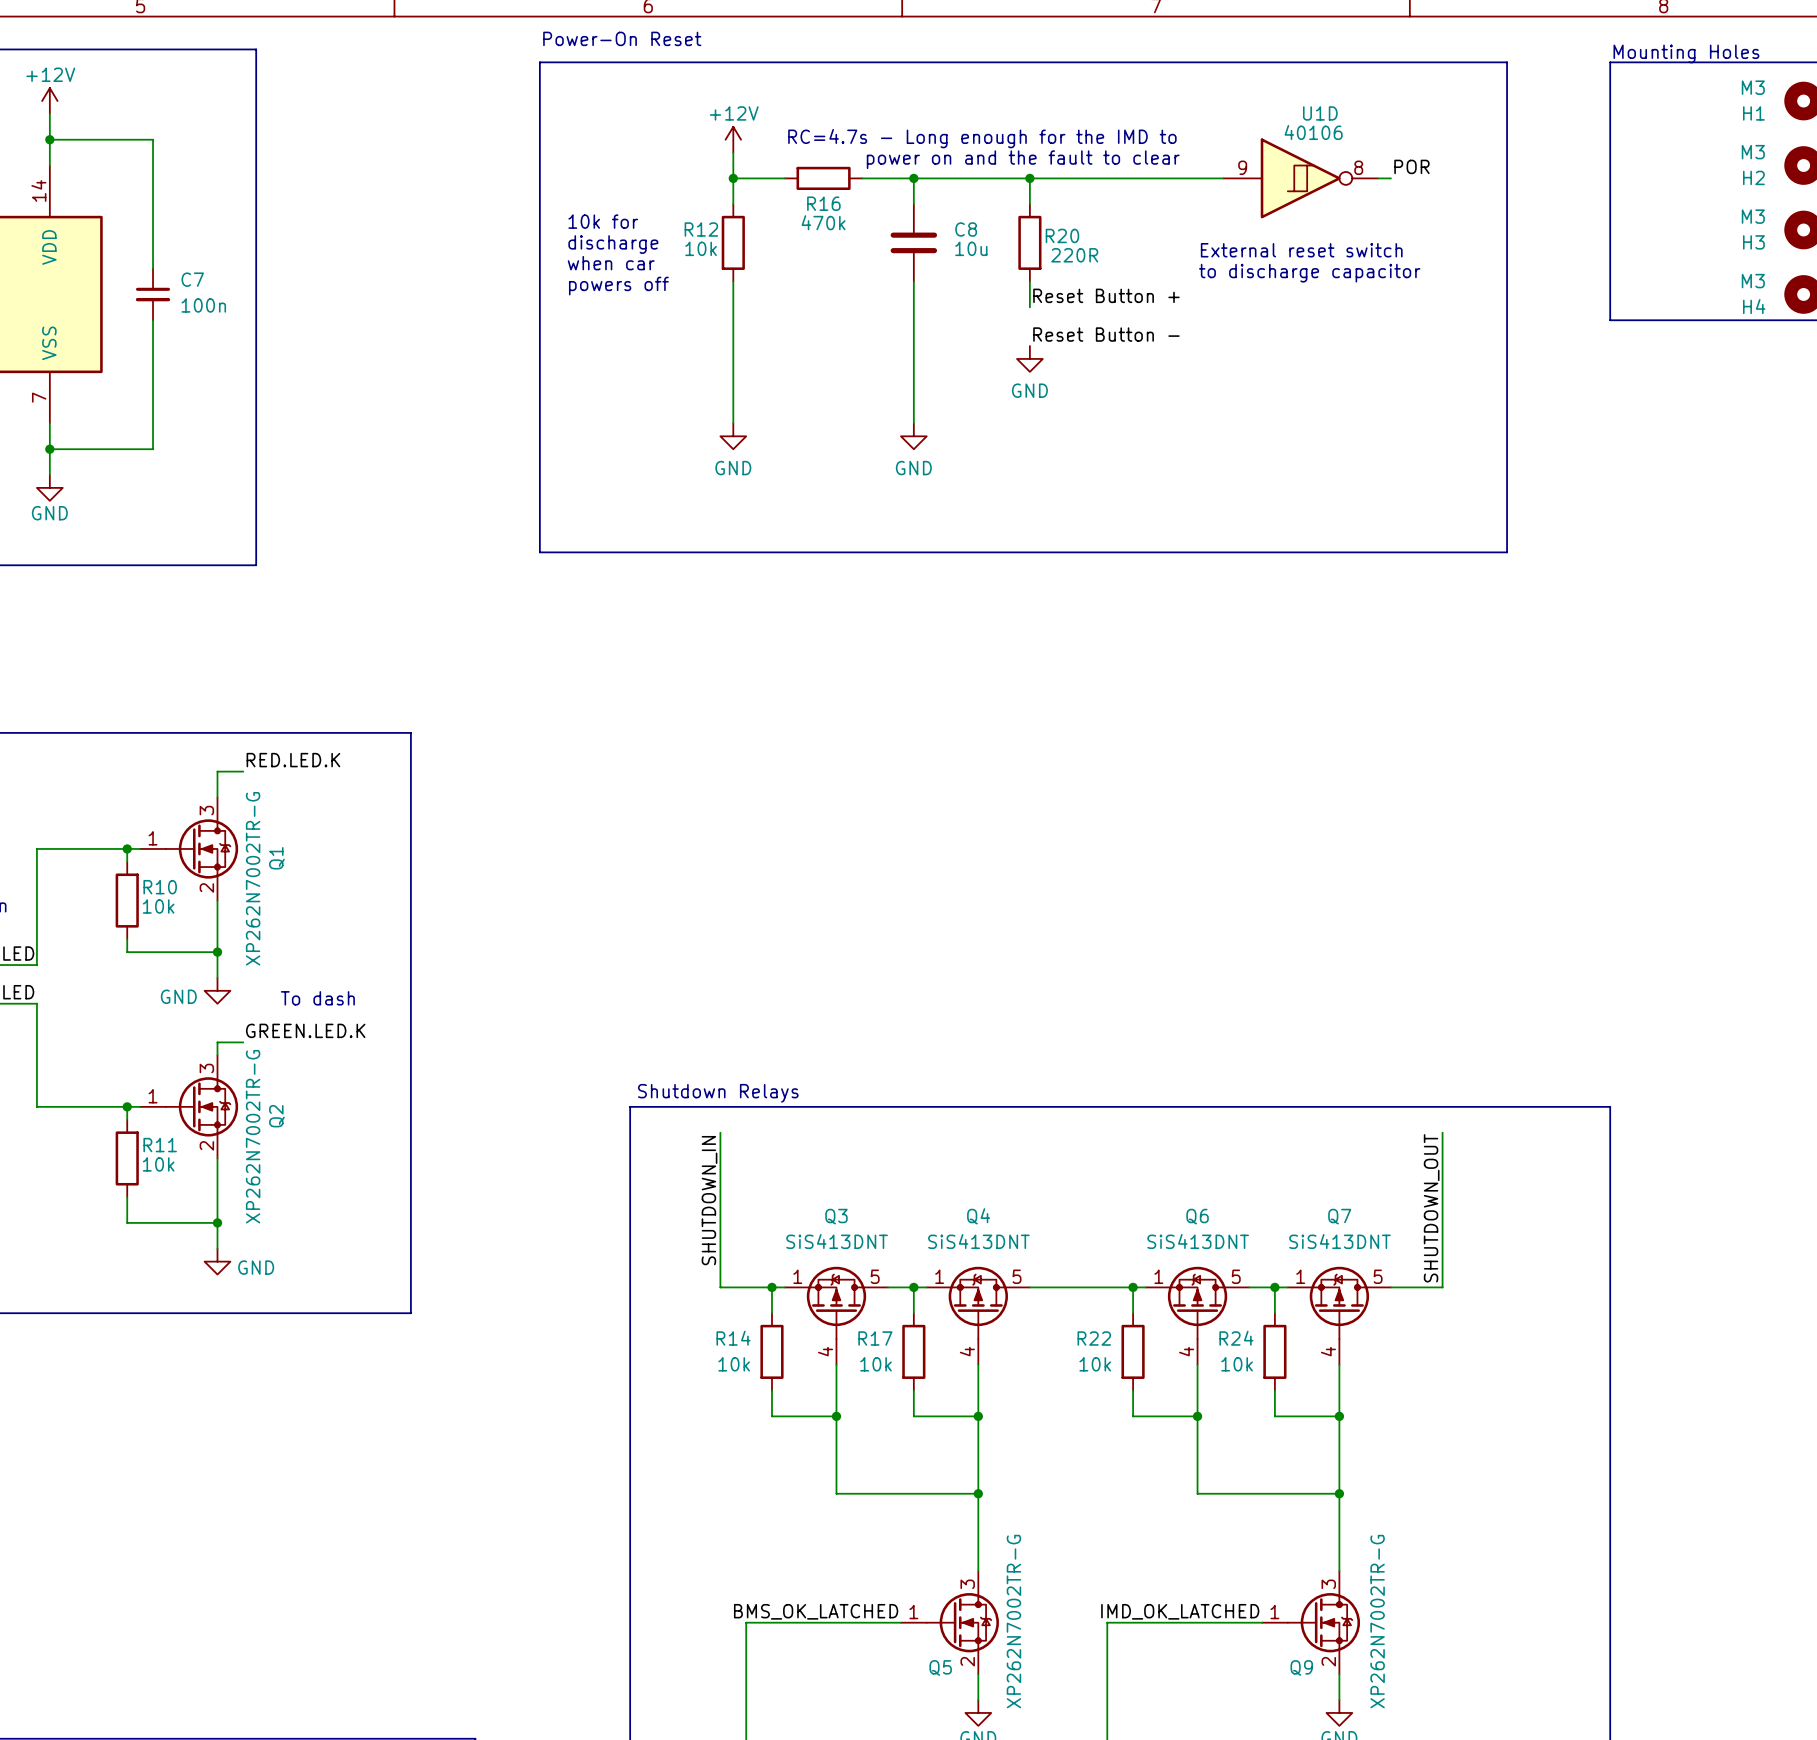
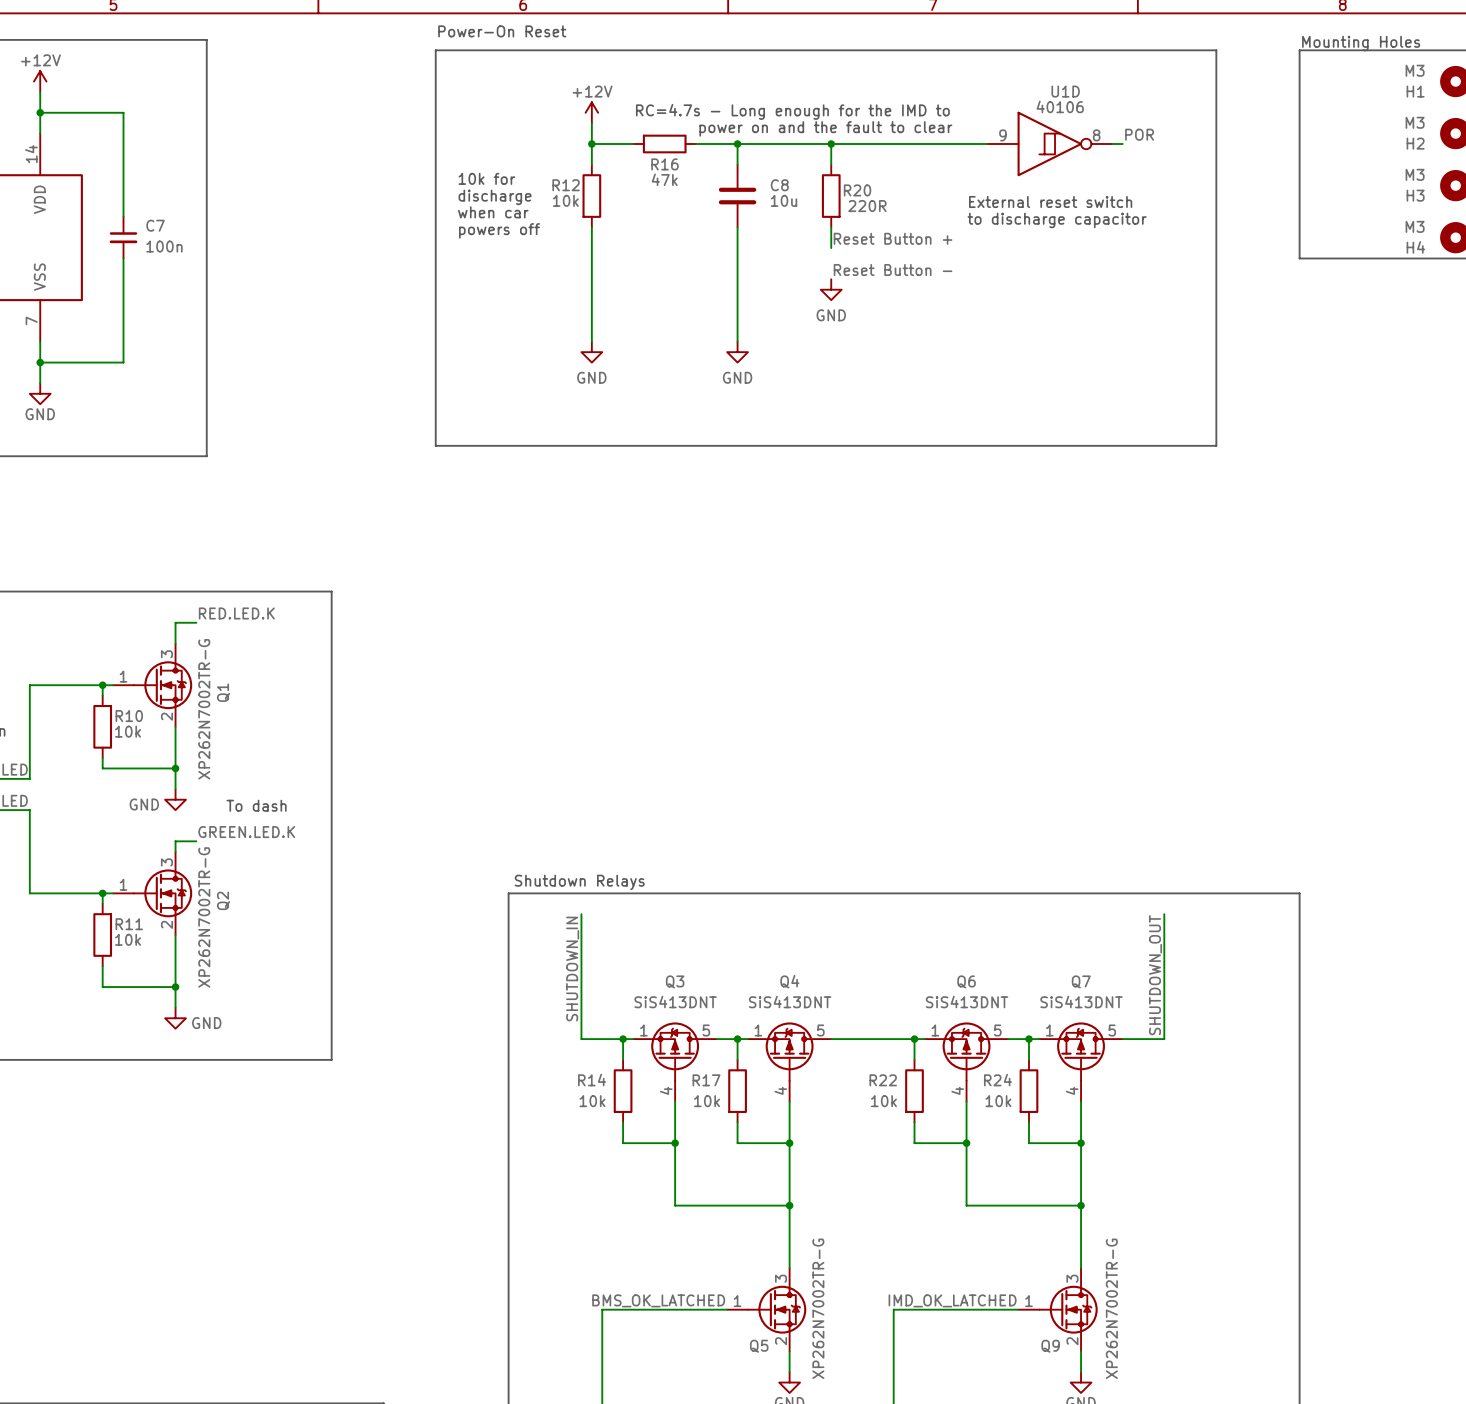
R16 value: 470k (823, 222) -> 47k (664, 179)

